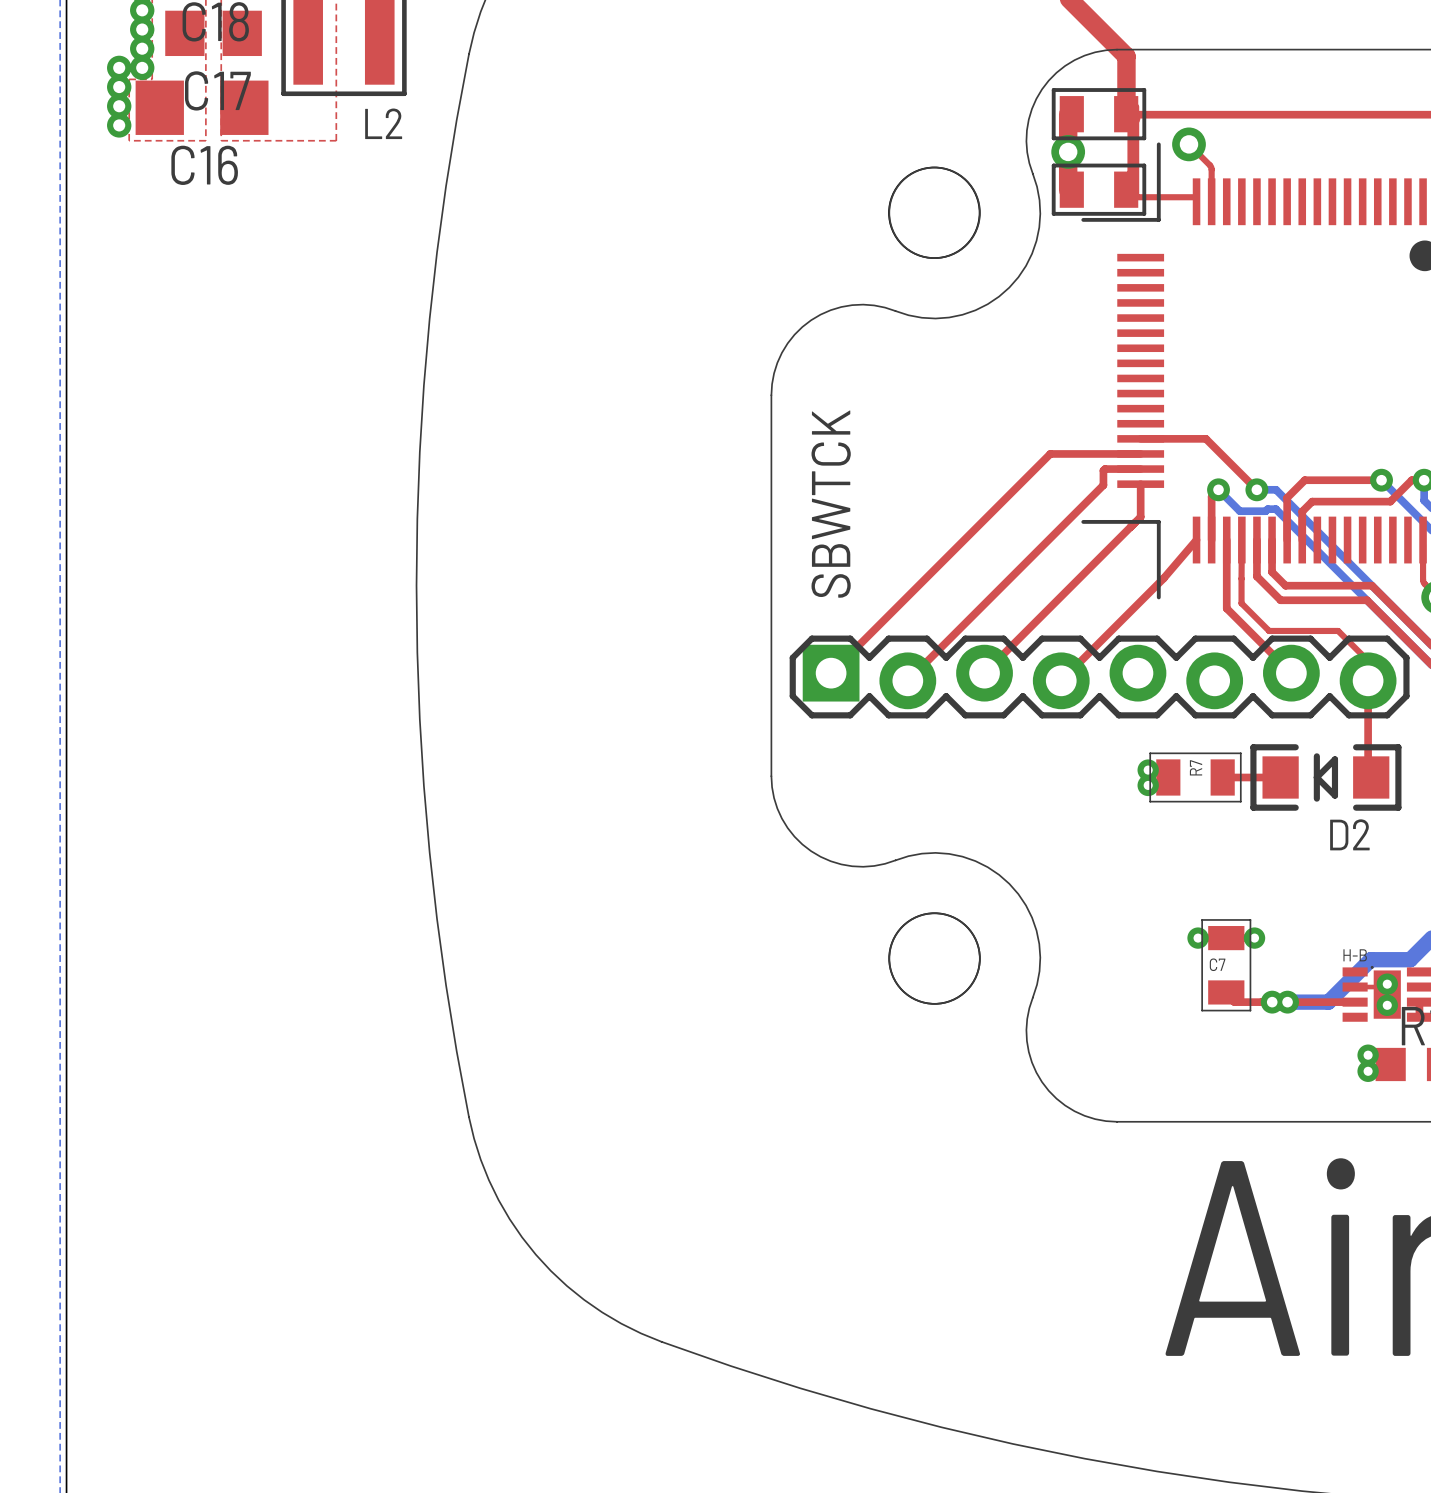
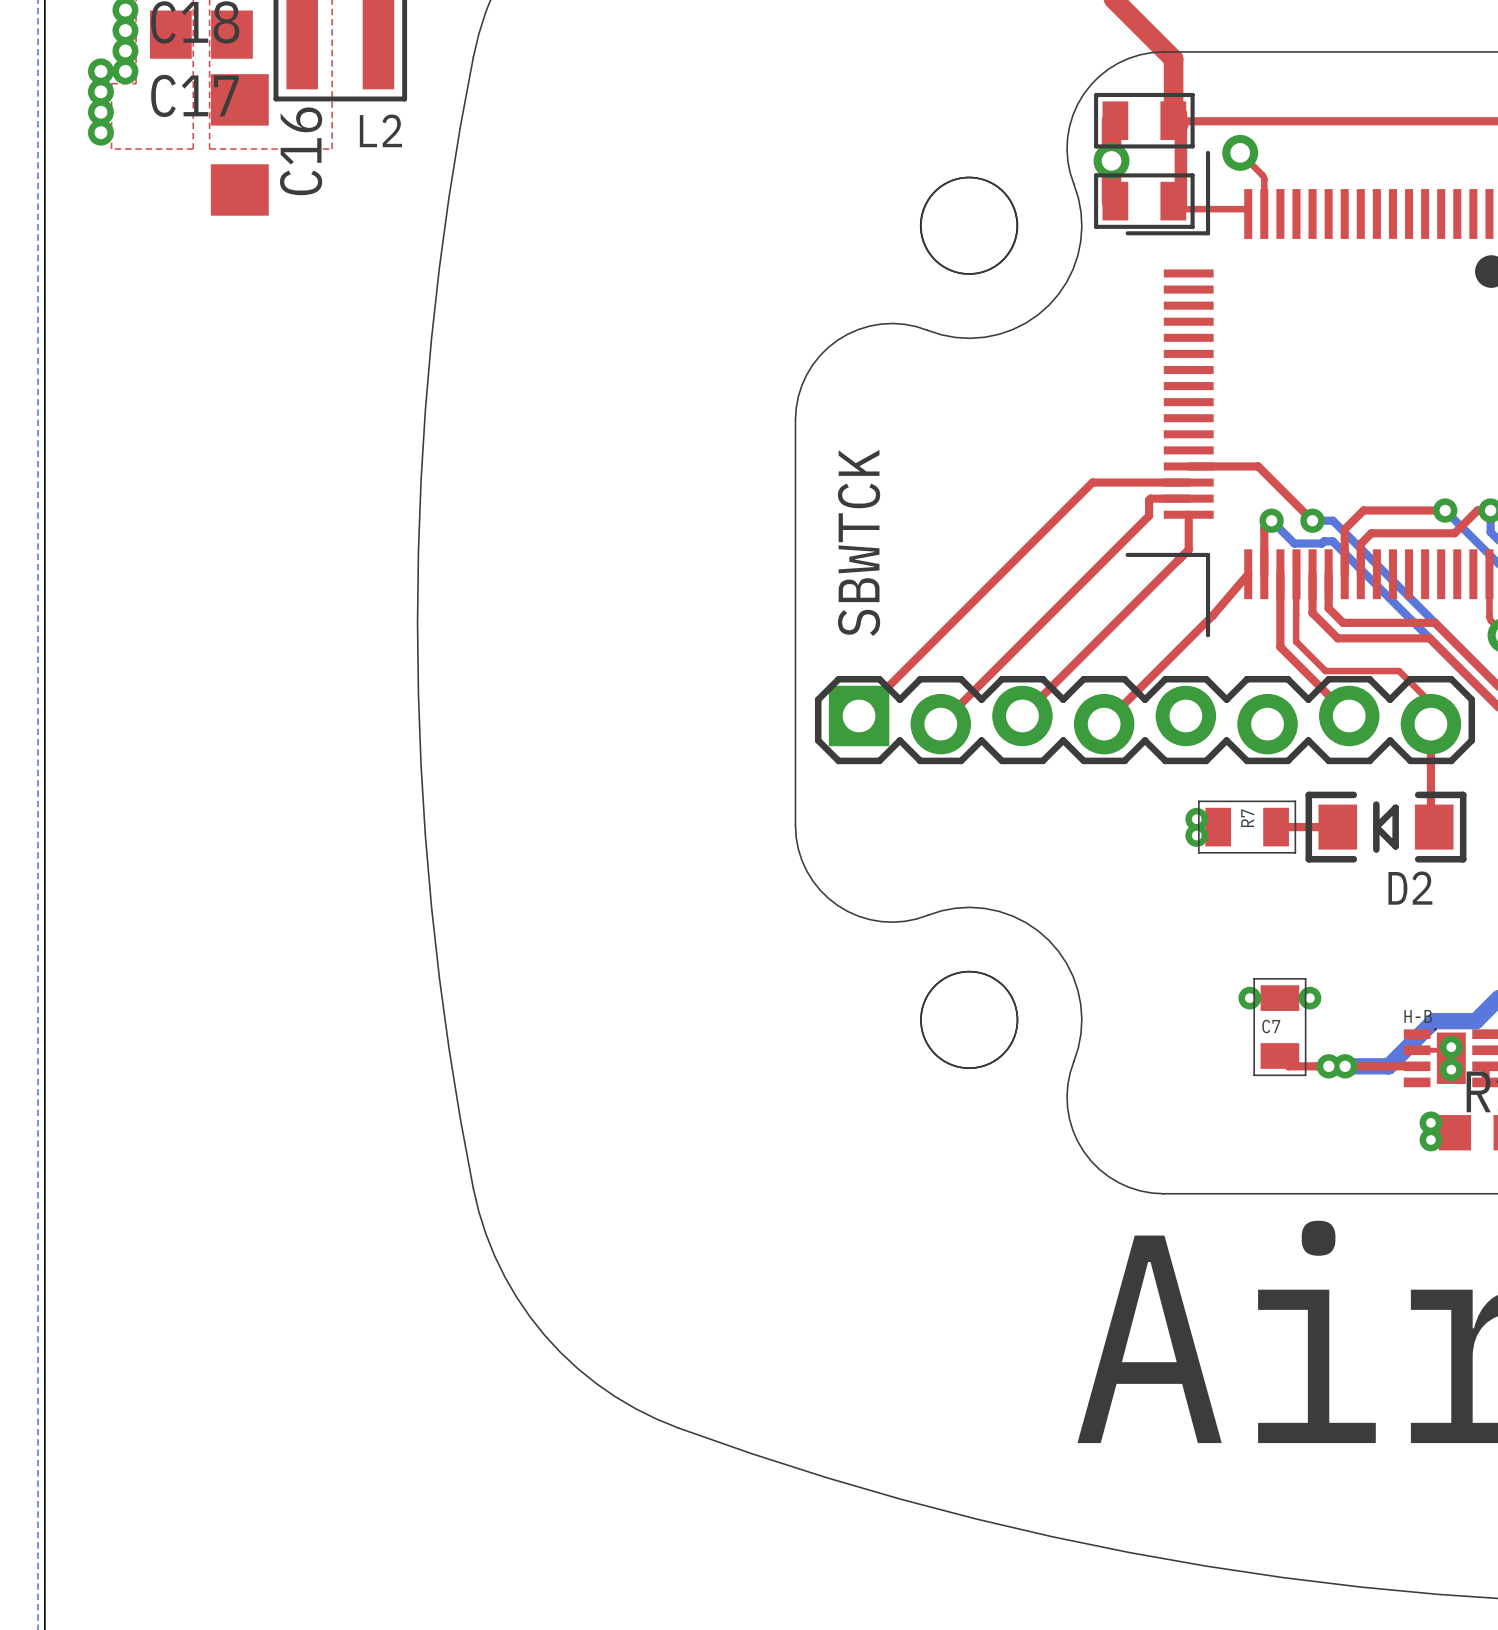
C16 rotation: 0° (202, 107) -> 90° clockwise (239, 144)
C16 name position: C16 (204, 165) -> C16 (301, 151)

